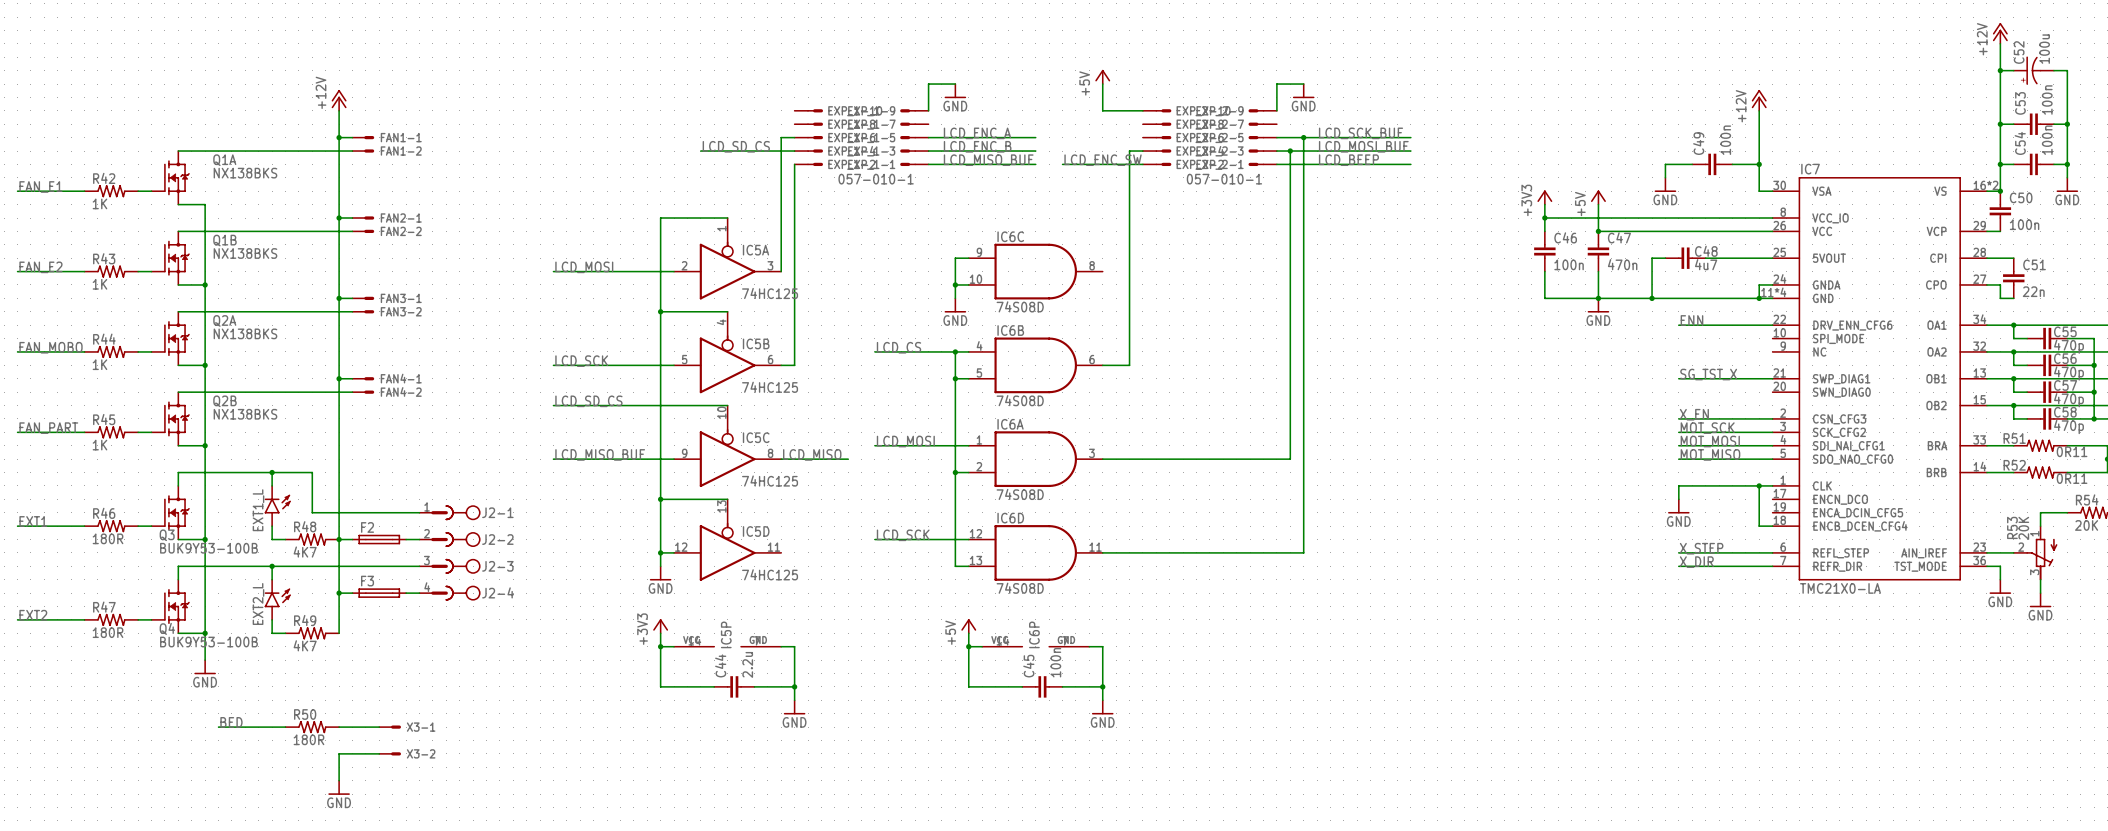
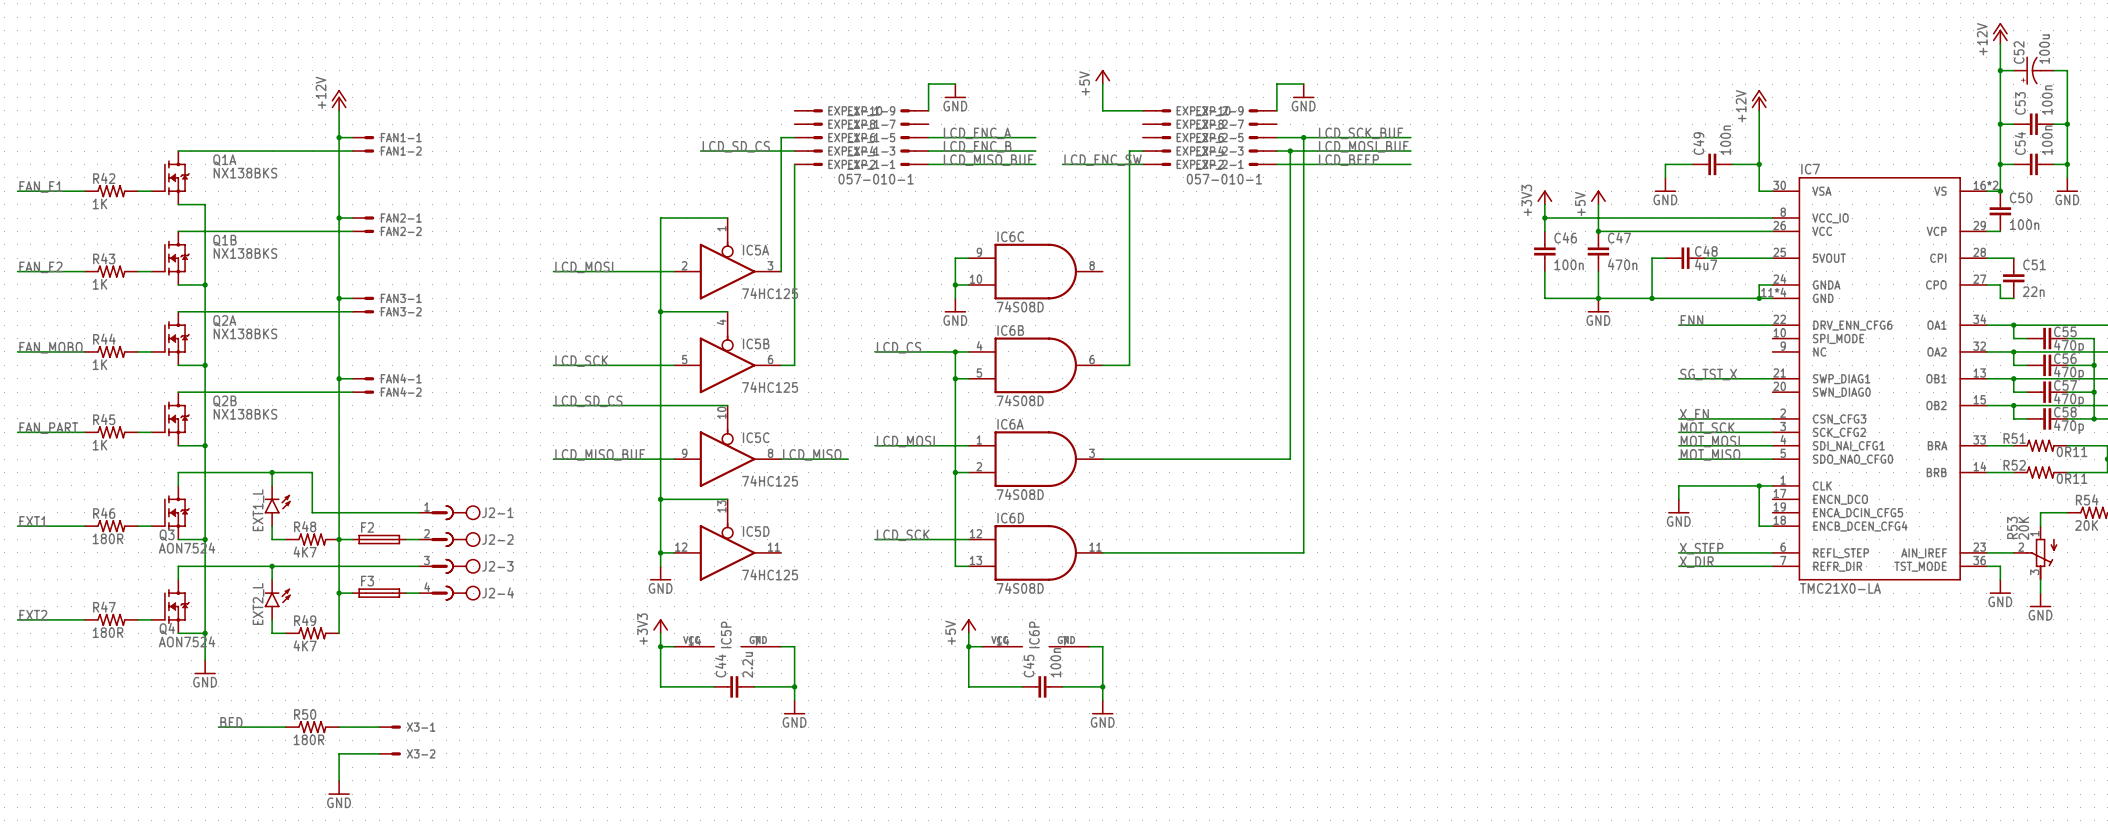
Q3 value: BUK9Y53-100B (208, 548) -> AON7524 (187, 548)
Q4 value: BUK9Y53-100B (208, 642) -> AON7524 (187, 641)

